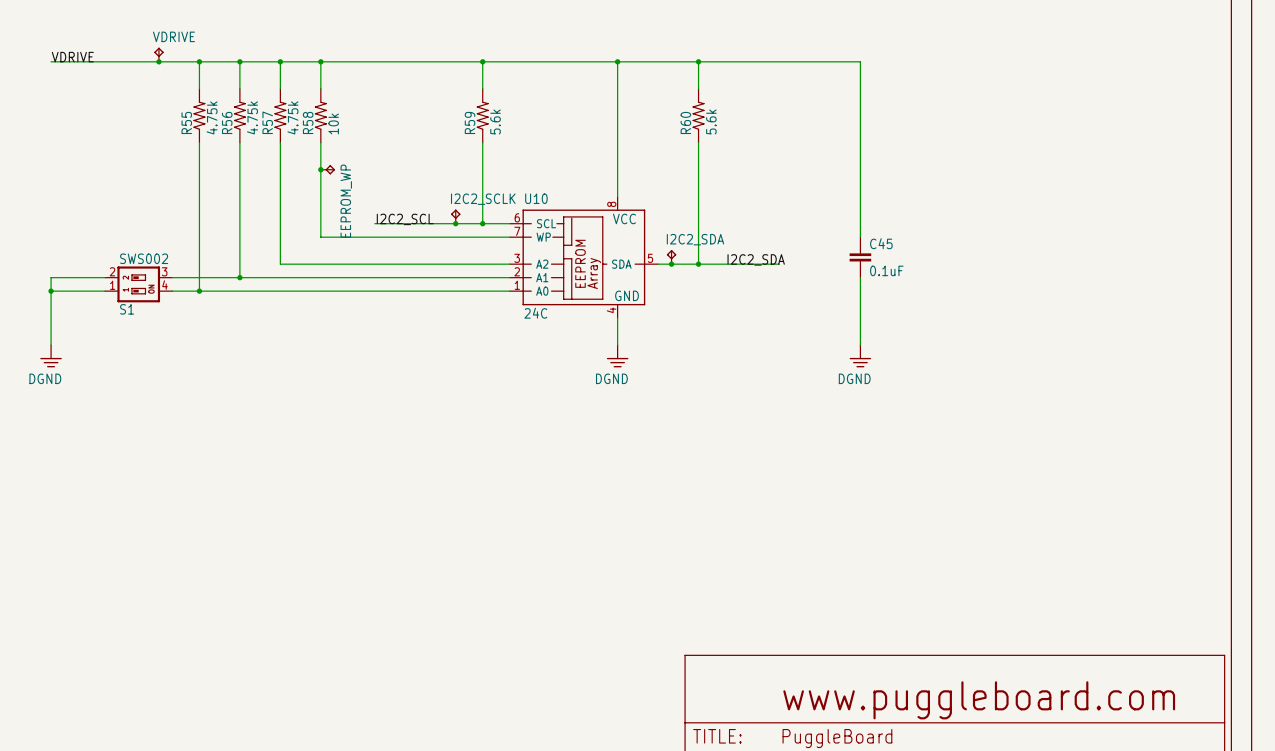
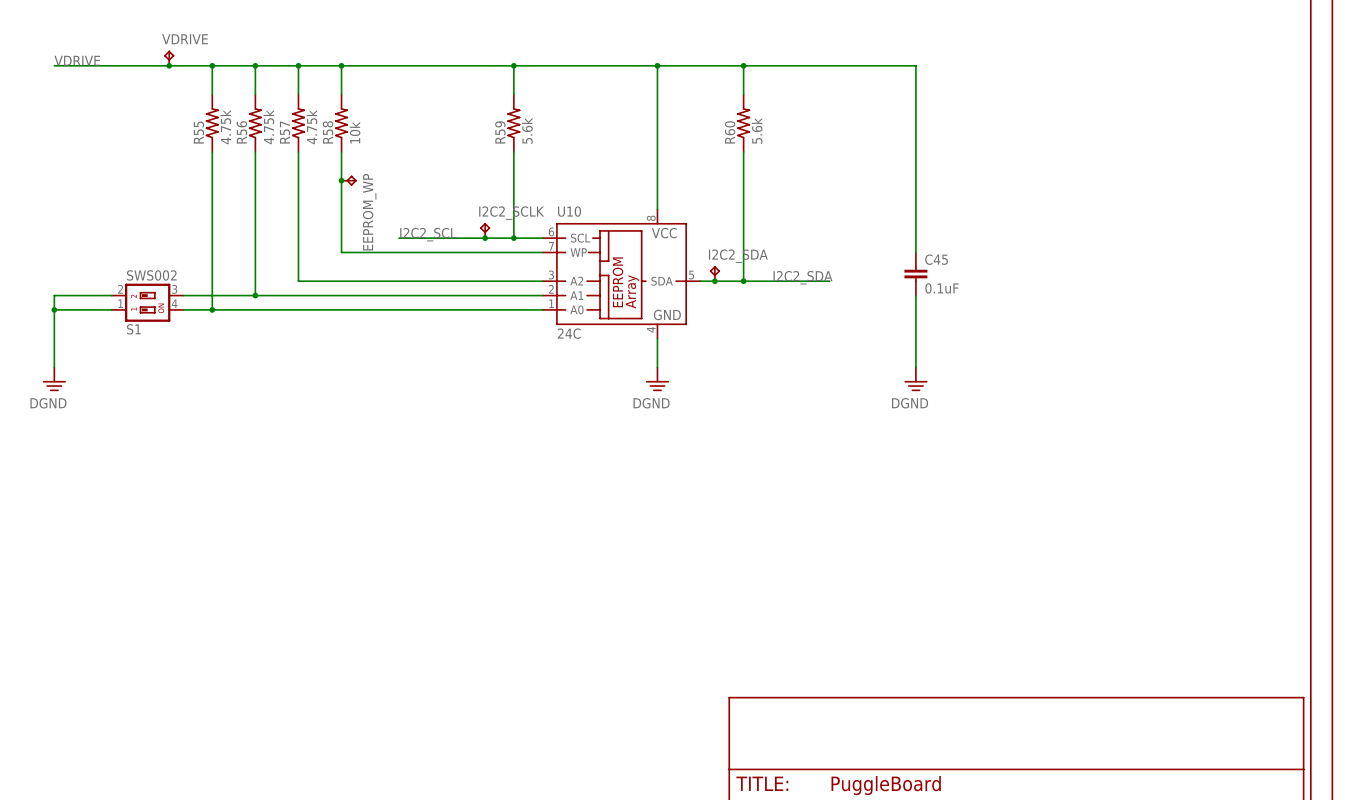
text: www.puggleboard.com (979, 700) -> none

